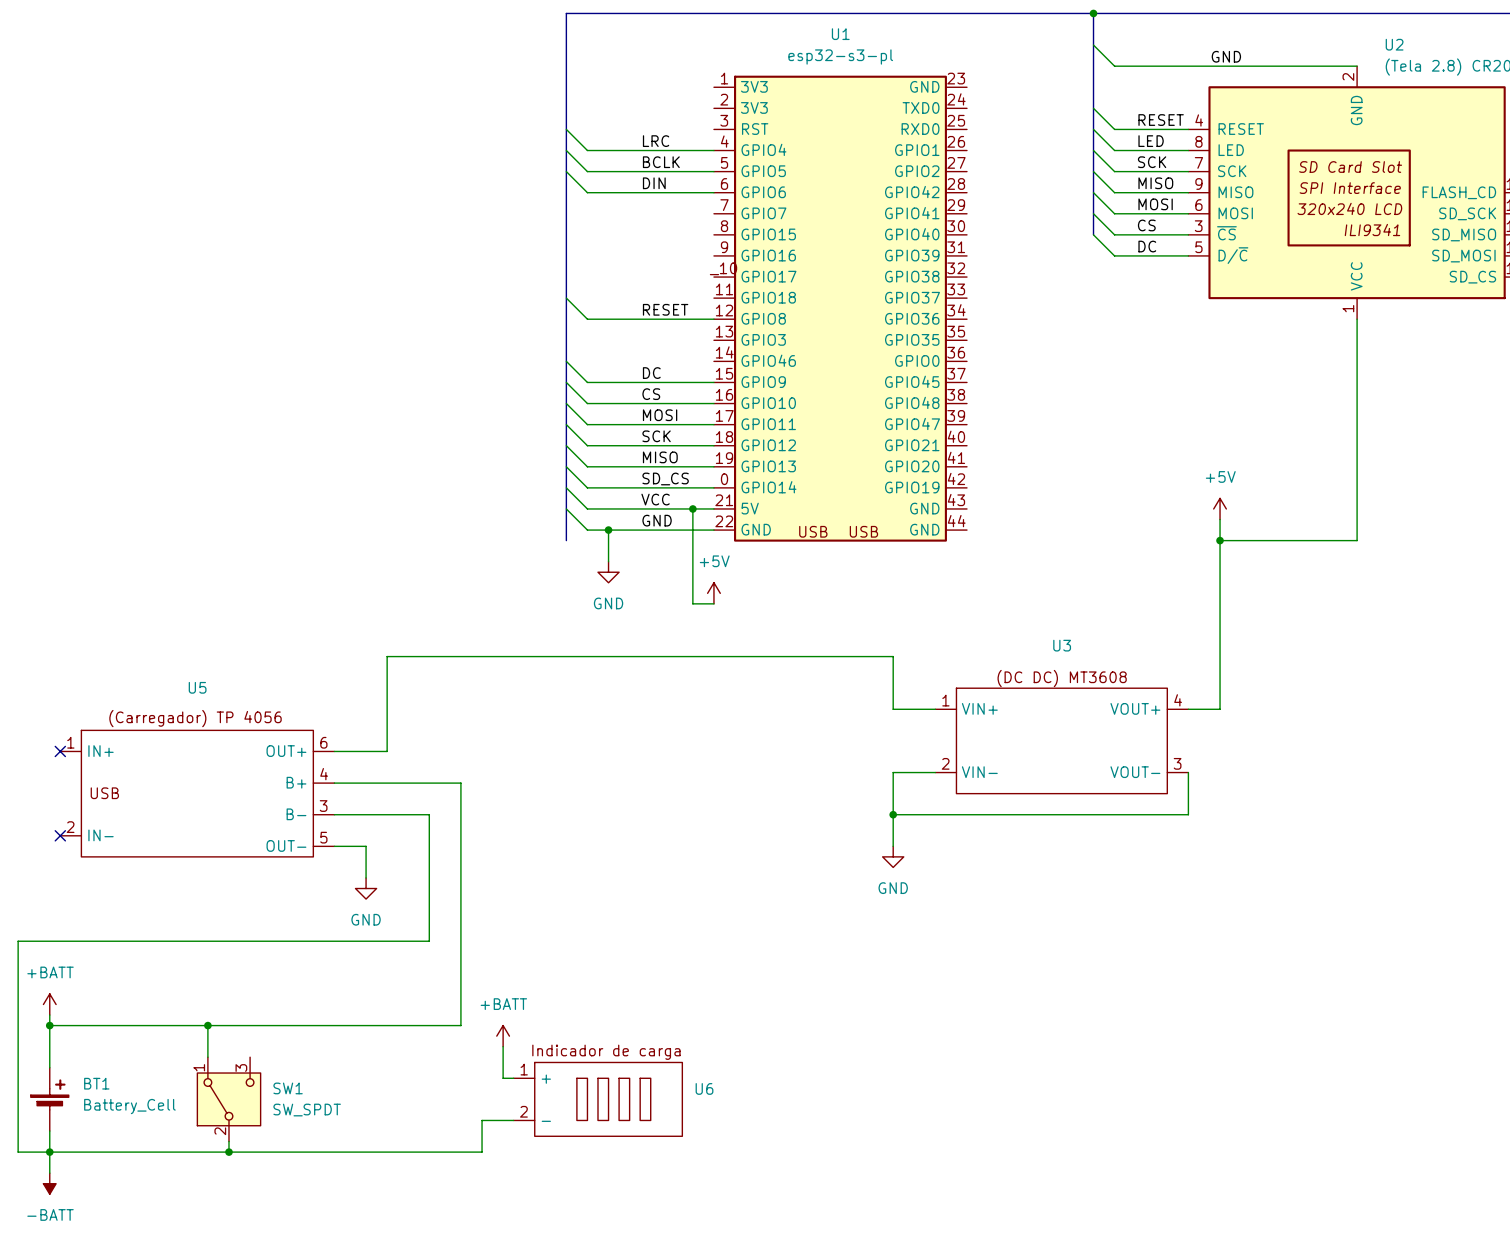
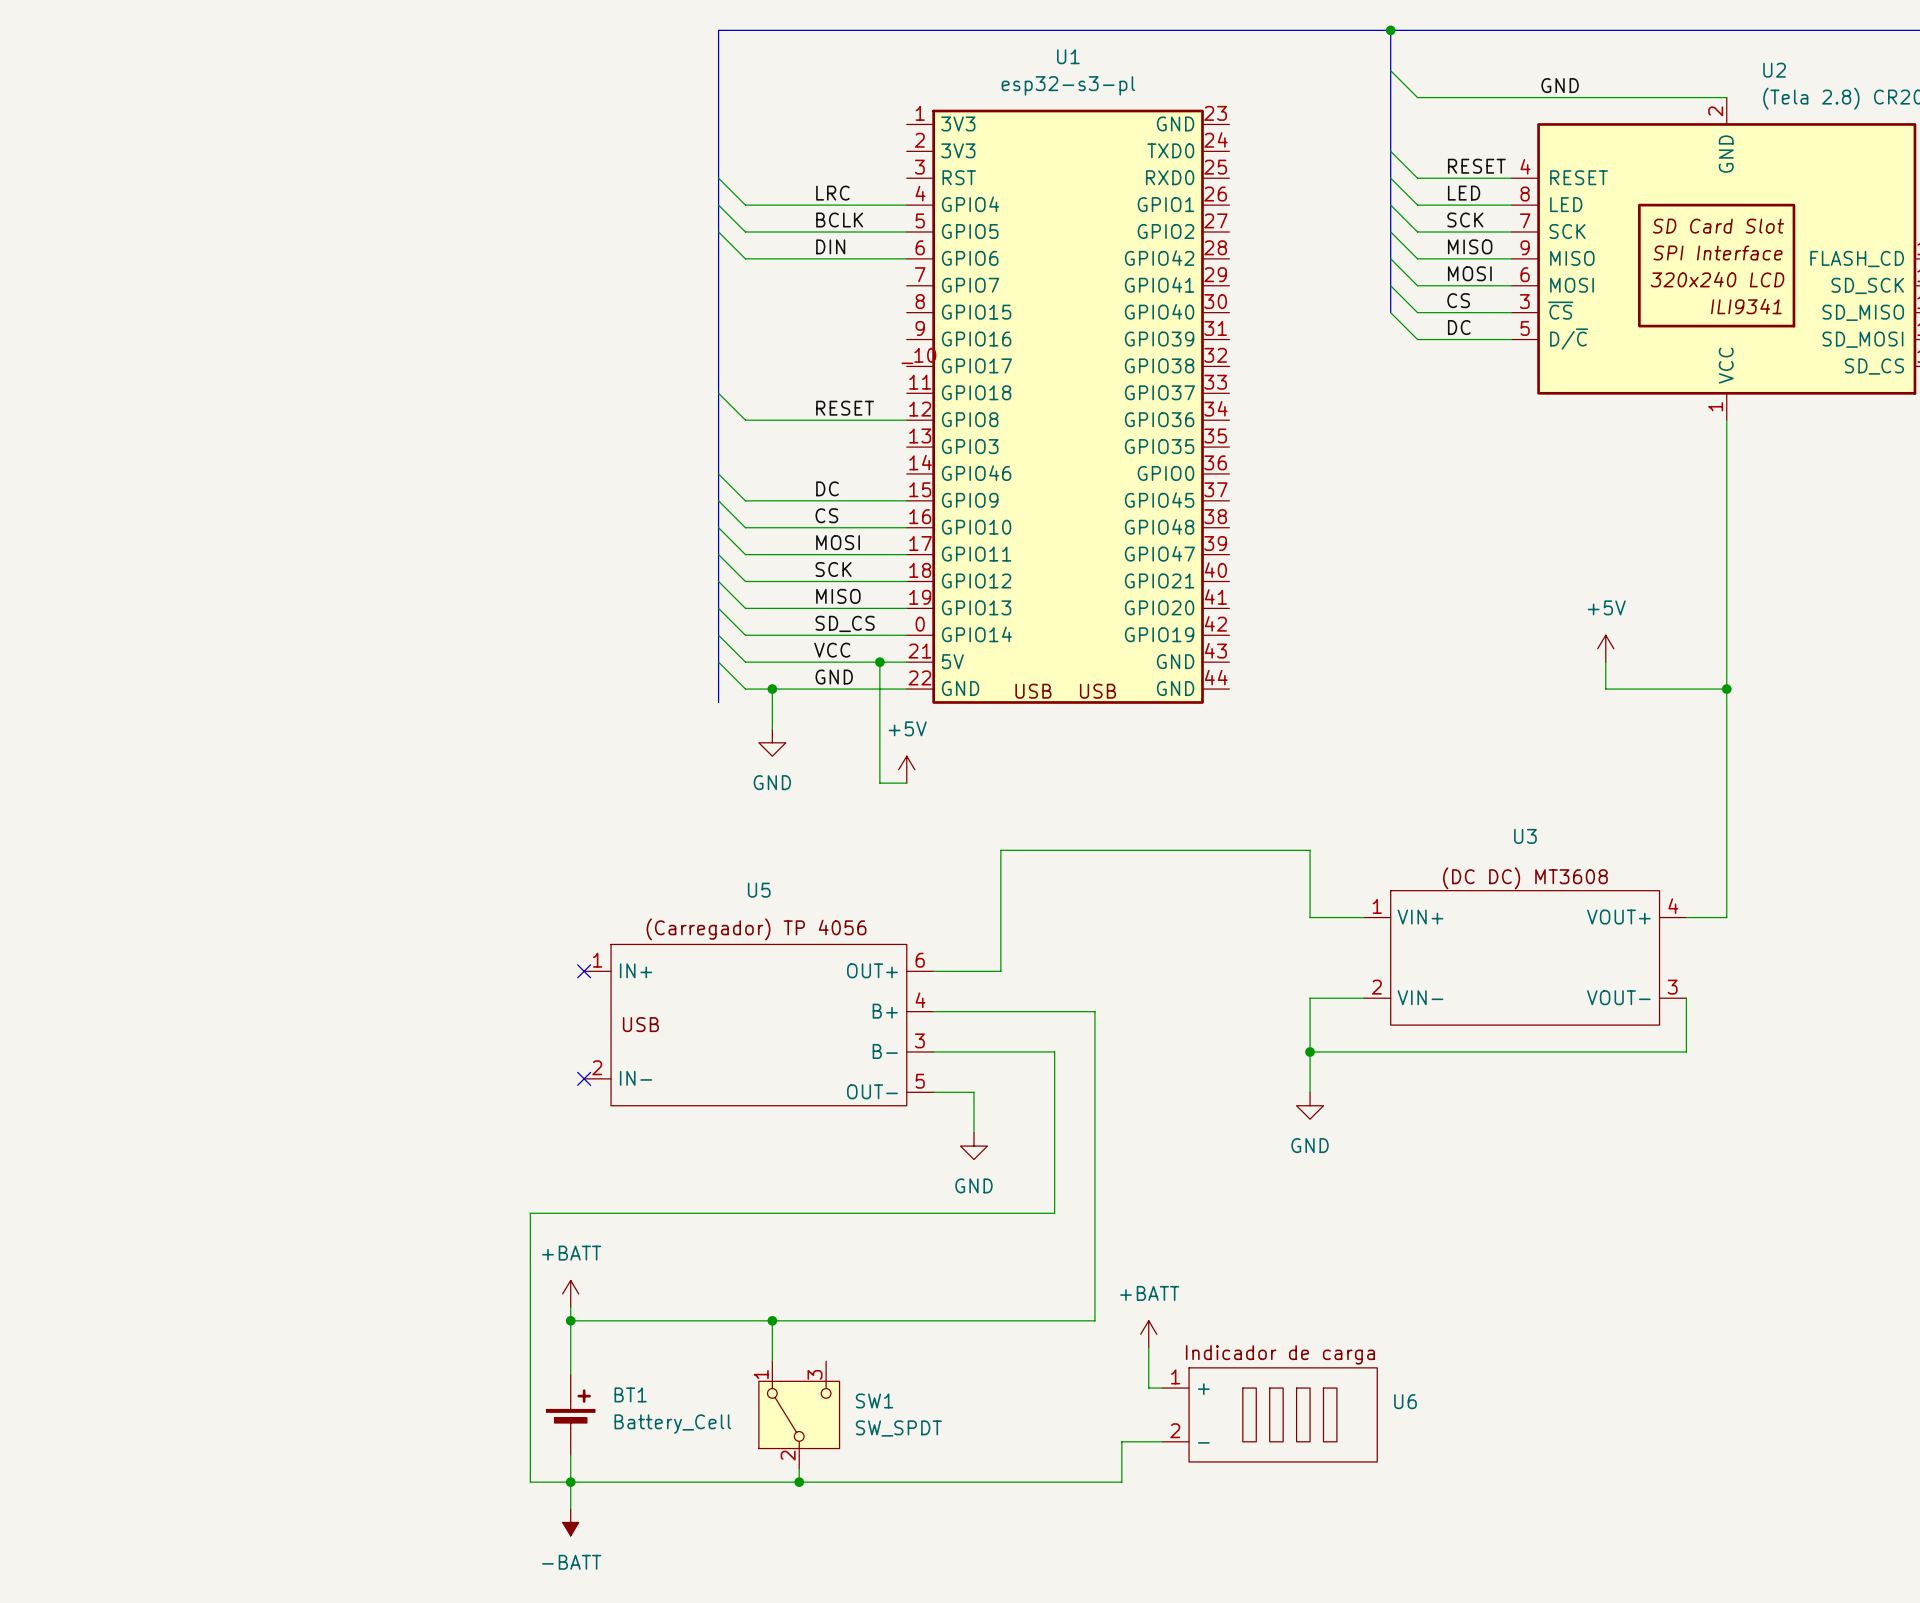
power symbol position: +5V (1220, 508) -> +5V (1605, 648)
wire: none -> (1605, 662) (1605, 689) (1726, 689)
wire: (1220, 519) (1220, 709) (1188, 709) -> none
junction: none -> (1726, 689)
wire: (1220, 540) (1357, 540) -> (1686, 917) (1726, 917) (1726, 702)
junction: (1220, 540) -> none
wire: (787, 656) (387, 656) (387, 751) (334, 751) -> (1000, 850) (1000, 971) (933, 971)
wire: (893, 656) (893, 709) (935, 709) -> (1135, 850) (1310, 850) (1310, 917) (1363, 917)
U3 position: (1061, 740) -> (1525, 957)
no-connect mark: (60, 751) -> none
no-connect mark: none -> (584, 971)
wire: (935, 772) (893, 772) (893, 846) -> (1363, 998) (1310, 998) (1310, 1092)
wire: (1188, 772) (1188, 814) -> (1686, 998) (1686, 1051) (1511, 1051)
wire: (334, 783) (460, 783) (460, 1025) -> (933, 1011) (1094, 1011) (1094, 1320) (584, 1320)
U5 position: (197, 793) -> (758, 1025)
wire: (334, 814) (429, 814) (429, 941) -> (933, 1051) (1054, 1051) (1054, 1213) (543, 1213)
wire: (893, 814) (1030, 814) -> none
junction: (893, 814) -> none
junction: none -> (1310, 1051)
no-connect mark: (60, 835) -> none
no-connect mark: none -> (584, 1078)
wire: (334, 846) (366, 846) (366, 877) -> none
wire: none -> (933, 1092) (973, 1092) (973, 1132)
power symbol: GND (893, 856) -> none
power symbol: none -> GND (1310, 1105)
power symbol: GND (366, 888) -> none
power symbol: none -> GND (973, 1146)
wire: (418, 941) (18, 941) (18, 1152) (418, 1152) -> (530, 1213) (530, 1482)
power symbol: +BATT (49, 1004) -> none
wire: (49, 1015) (49, 1067) -> none
wire: none -> (570, 1307) (570, 1374)
wire: (49, 1025) (450, 1025) -> none
junction: (49, 1025) -> none
wire: (207, 1025) (207, 1057) -> none
junction: (207, 1025) -> none
junction: none -> (570, 1320)
wire: none -> (772, 1320) (772, 1361)
junction: none -> (772, 1320)
power symbol position: +BATT (503, 1036) -> +BATT (570, 1293)
power symbol: none -> +BATT (1148, 1334)
wire: (503, 1046) (503, 1078) (513, 1078) -> none
wire: none -> (1148, 1347) (1148, 1388) (1162, 1388)
BT1 position: (49, 1099) -> (570, 1414)
SW1 position: (228, 1099) -> (799, 1414)
U6 position: (597, 1099) -> (1269, 1414)
wire: (513, 1120) (482, 1120) (482, 1152) -> (1162, 1441) (1121, 1441) (1121, 1482) (611, 1482)
wire: (49, 1131) (49, 1173) -> none
wire: none -> (570, 1455) (570, 1509)
wire: (228, 1141) (228, 1152) -> none
wire: none -> (799, 1468) (799, 1482)
junction: (49, 1152) -> none
junction: (228, 1152) -> none
junction: none -> (570, 1482)
junction: none -> (799, 1482)
power symbol: -BATT (49, 1183) -> none
power symbol: none -> -BATT (570, 1522)

